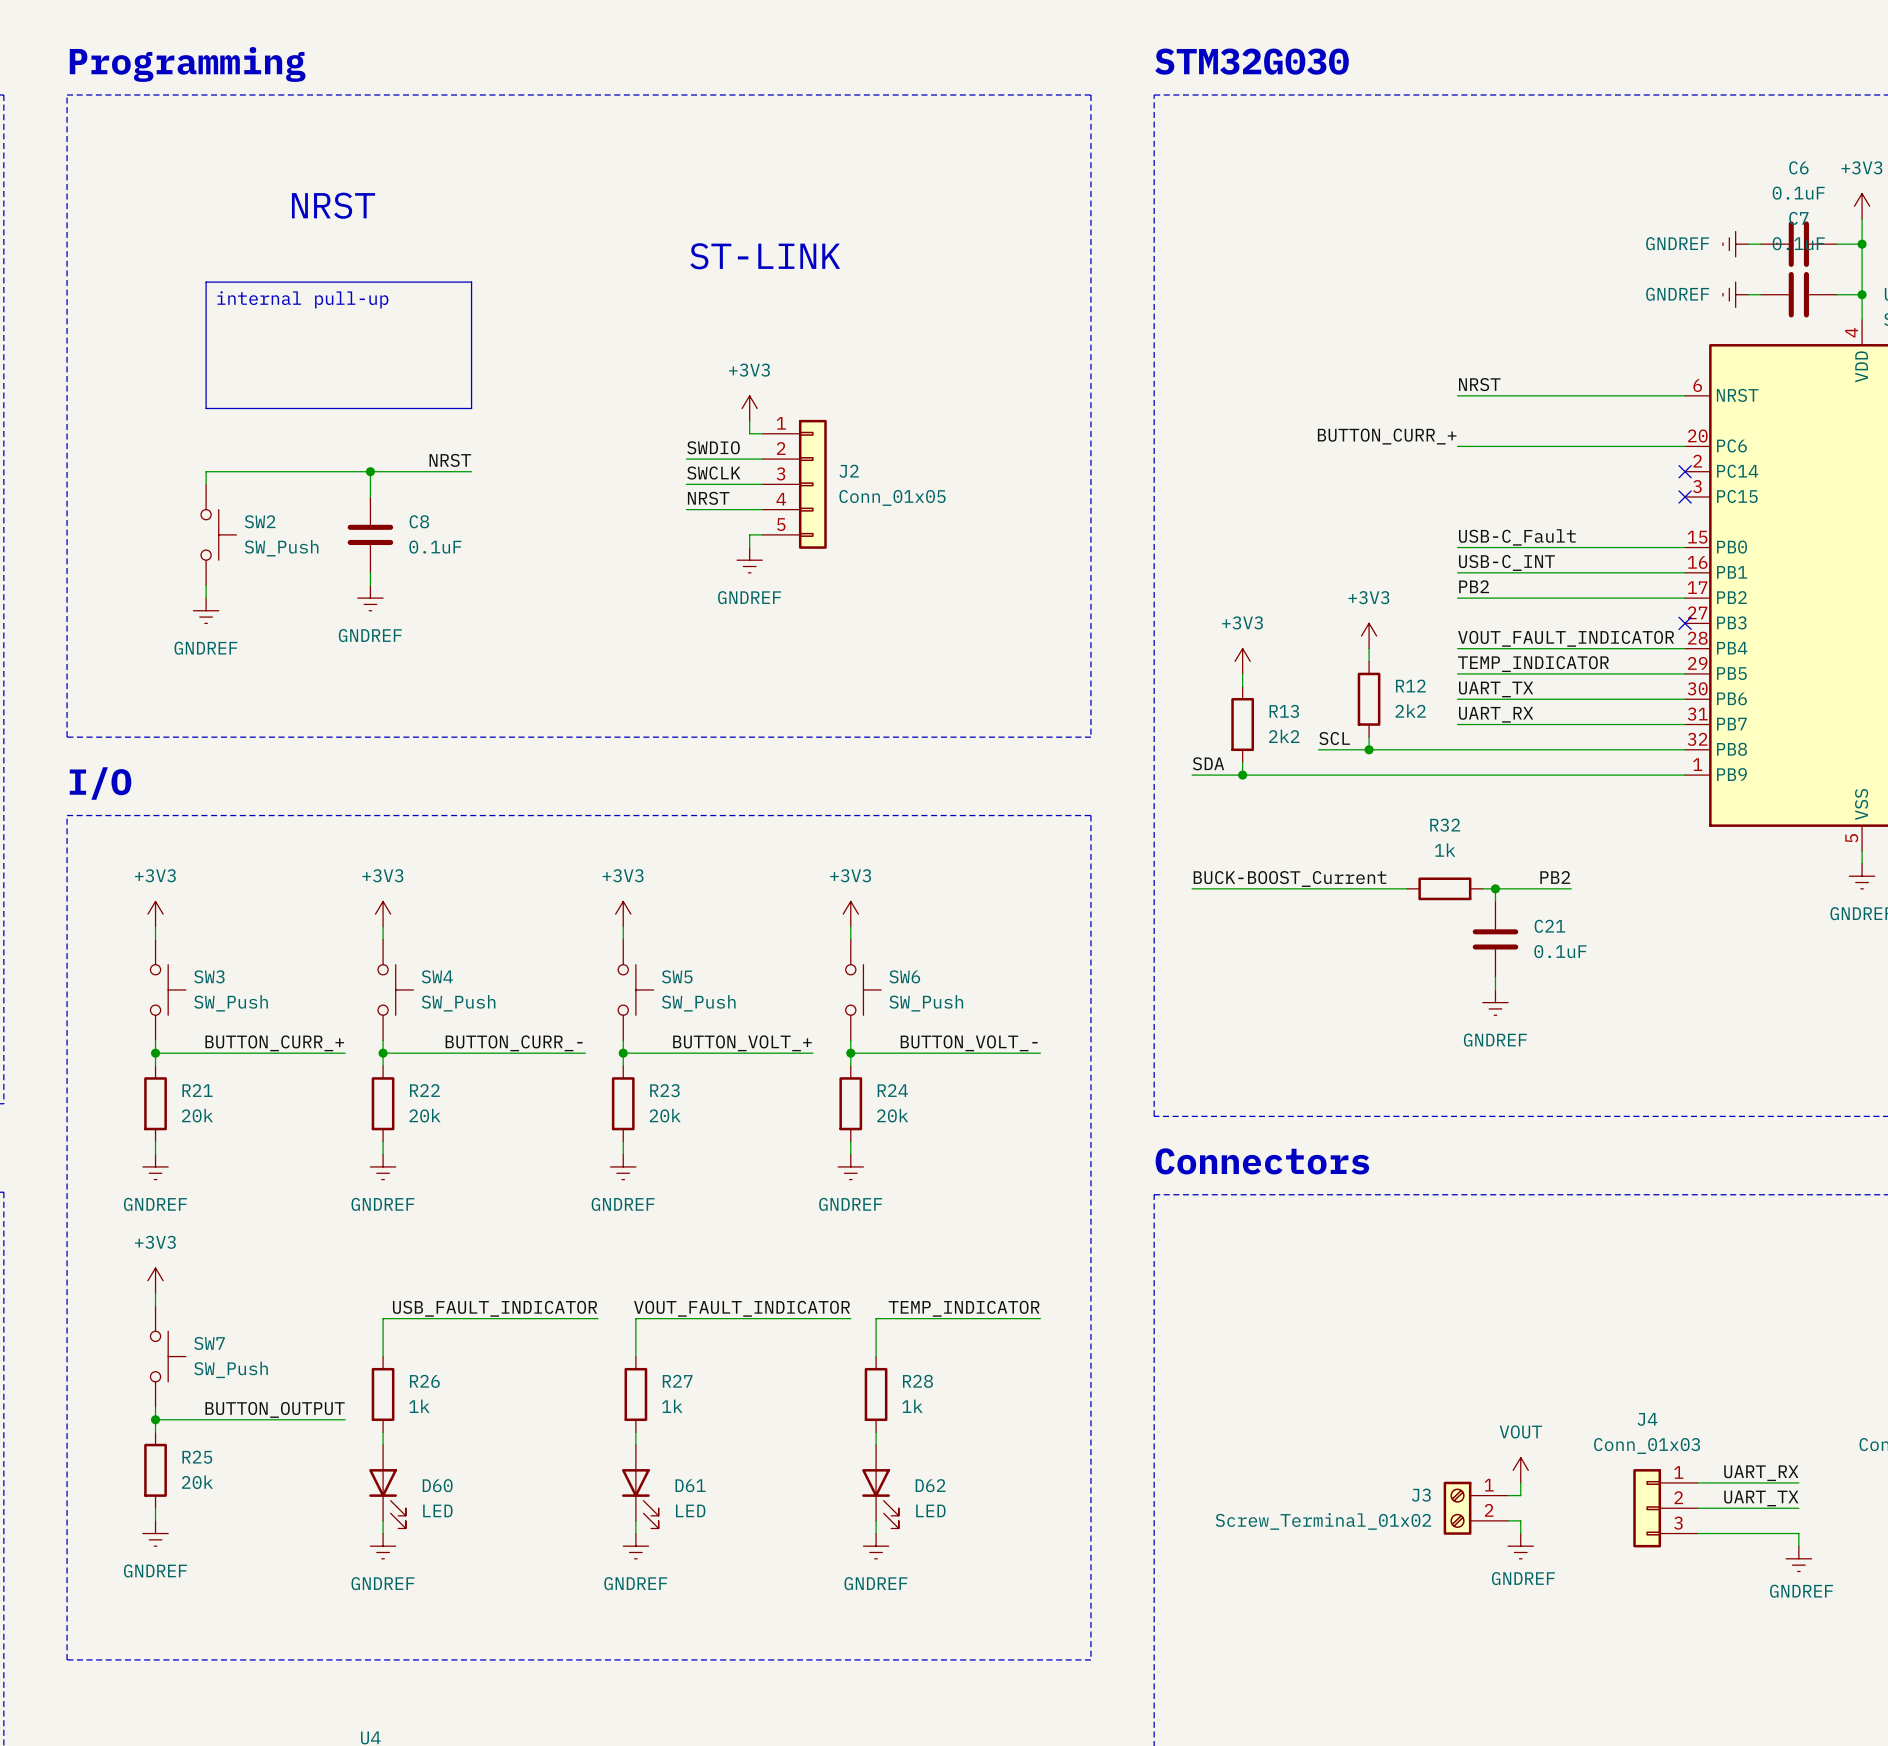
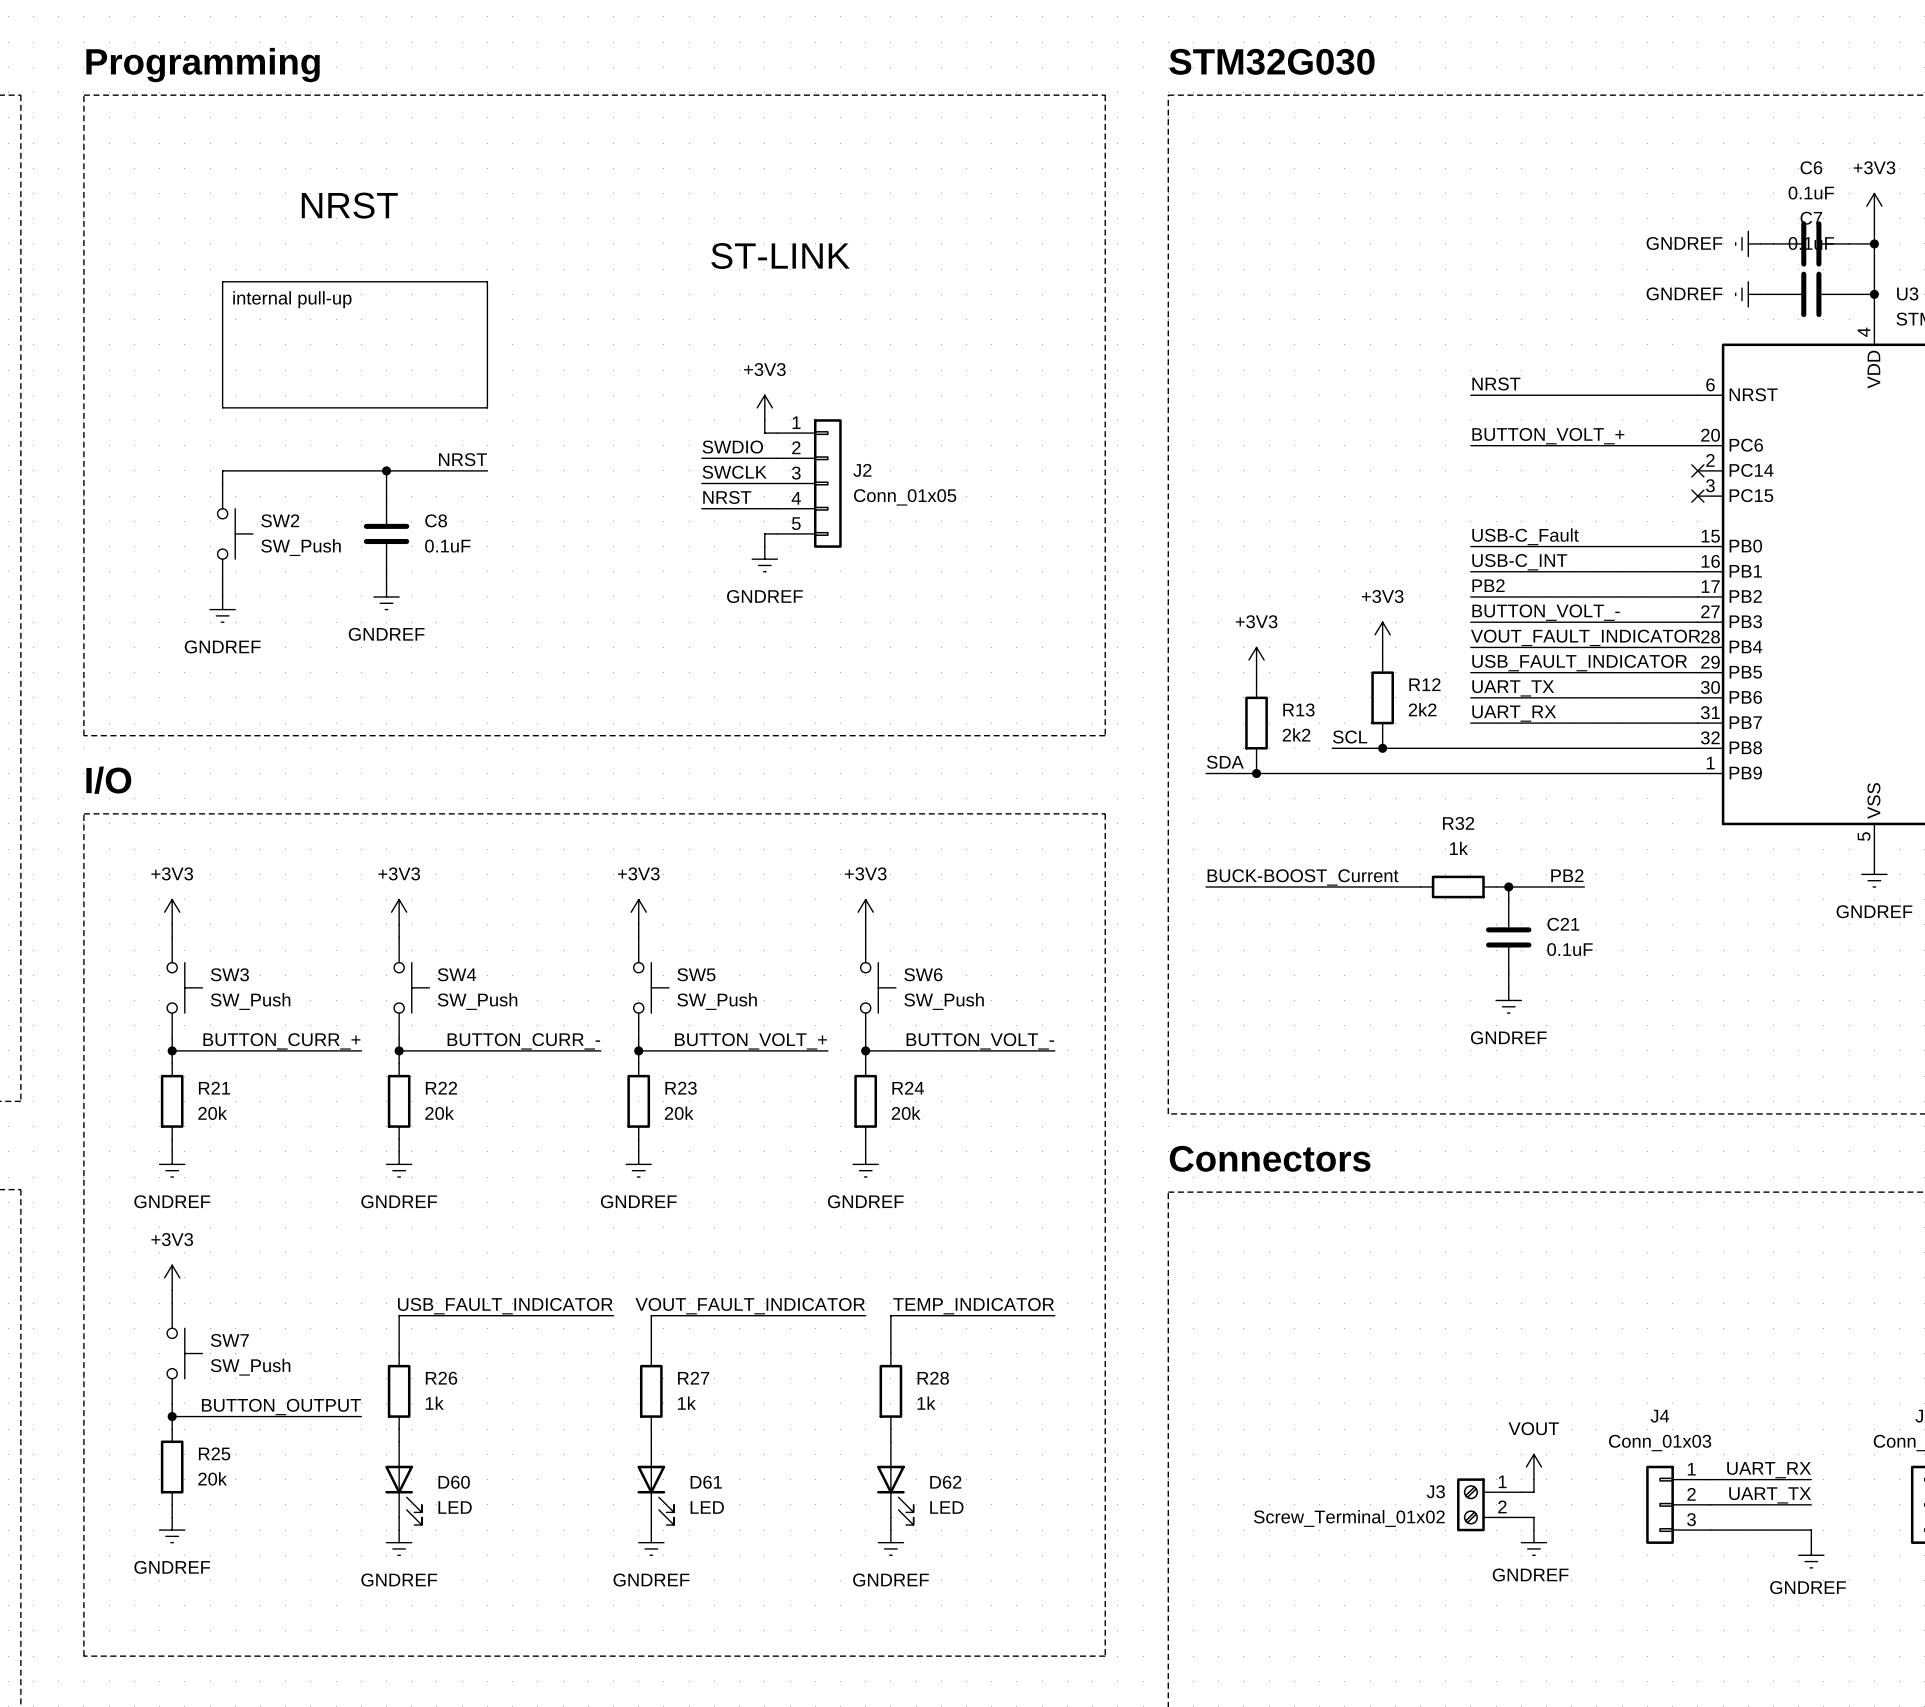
label: BUTTON_CURR_+ (1387, 436) -> BUTTON_VOLT_+ (1548, 436)
label: none -> BUTTON_VOLT_- (1546, 612)
wire: none -> (1470, 622) (1697, 622)
no-connect mark: (1685, 623) -> none
label: TEMP_INDICATOR (1533, 664) -> USB_FAULT_INDICATOR (1579, 663)

